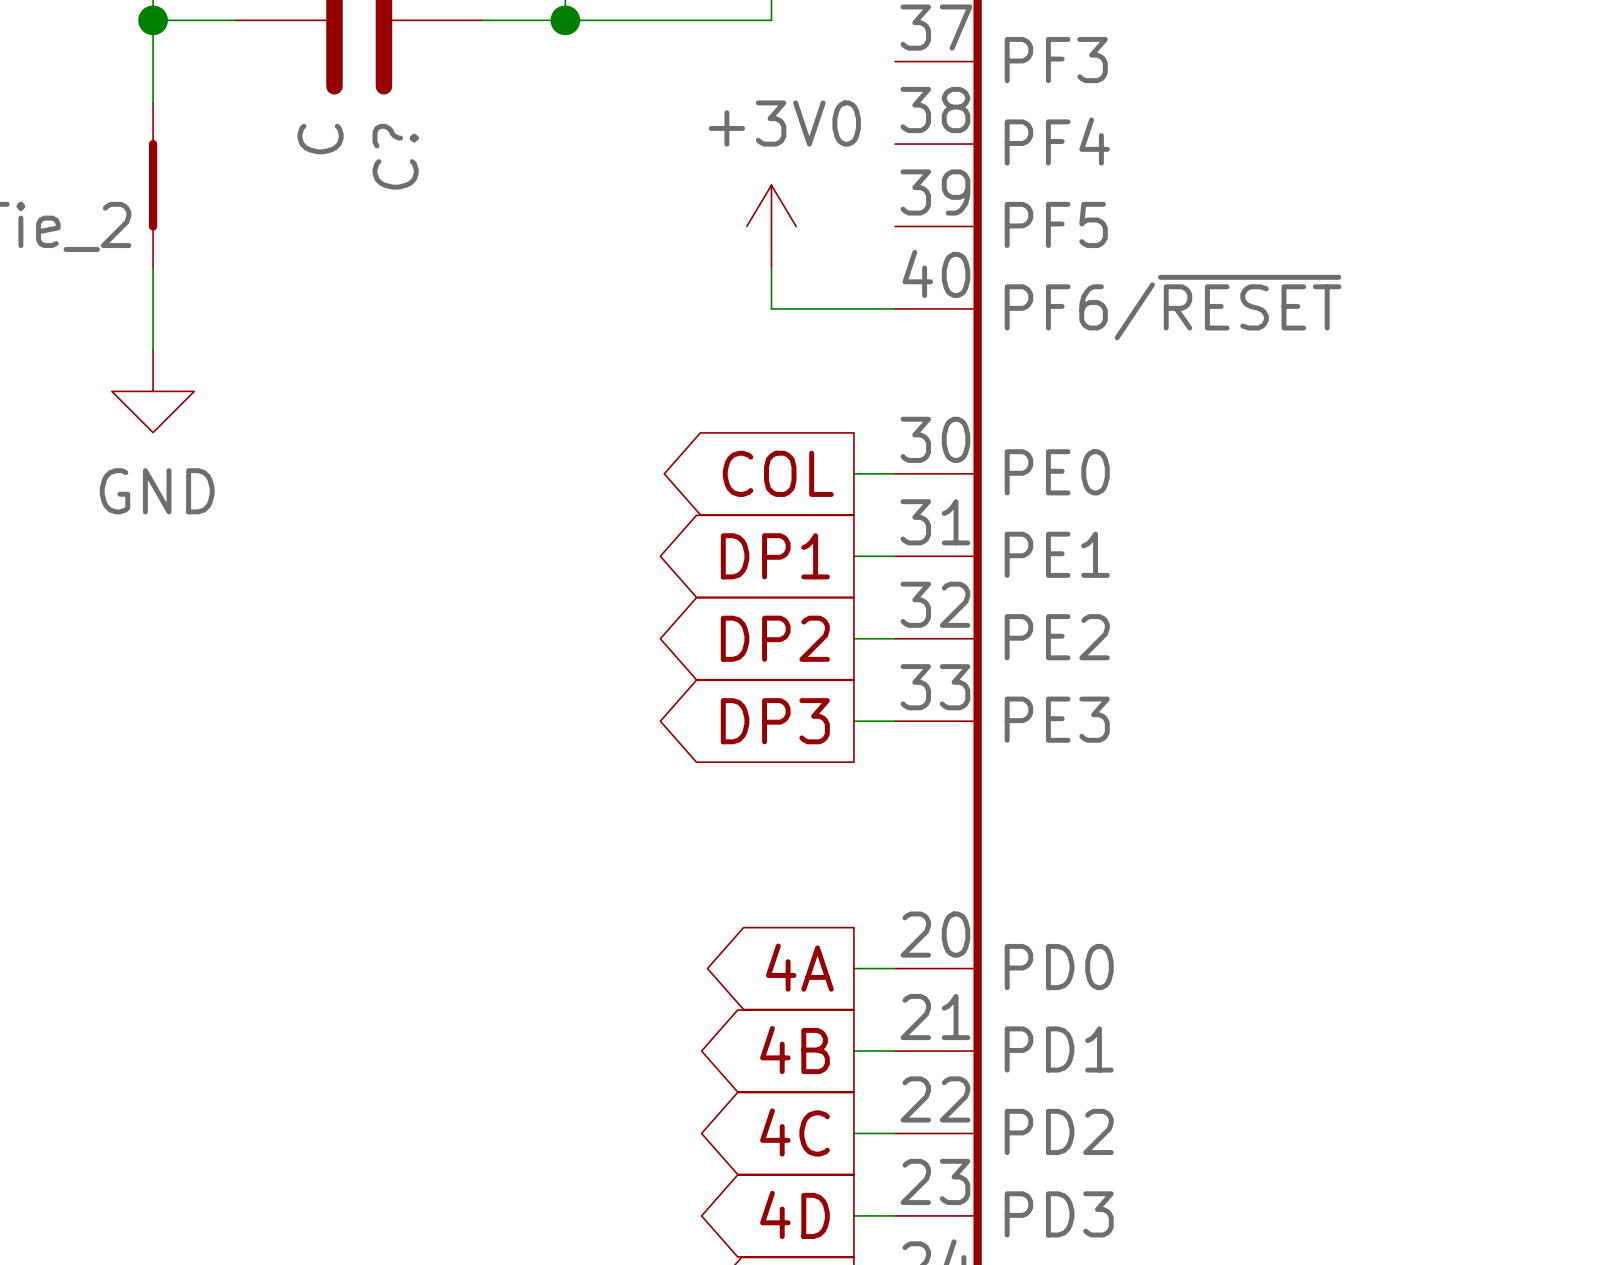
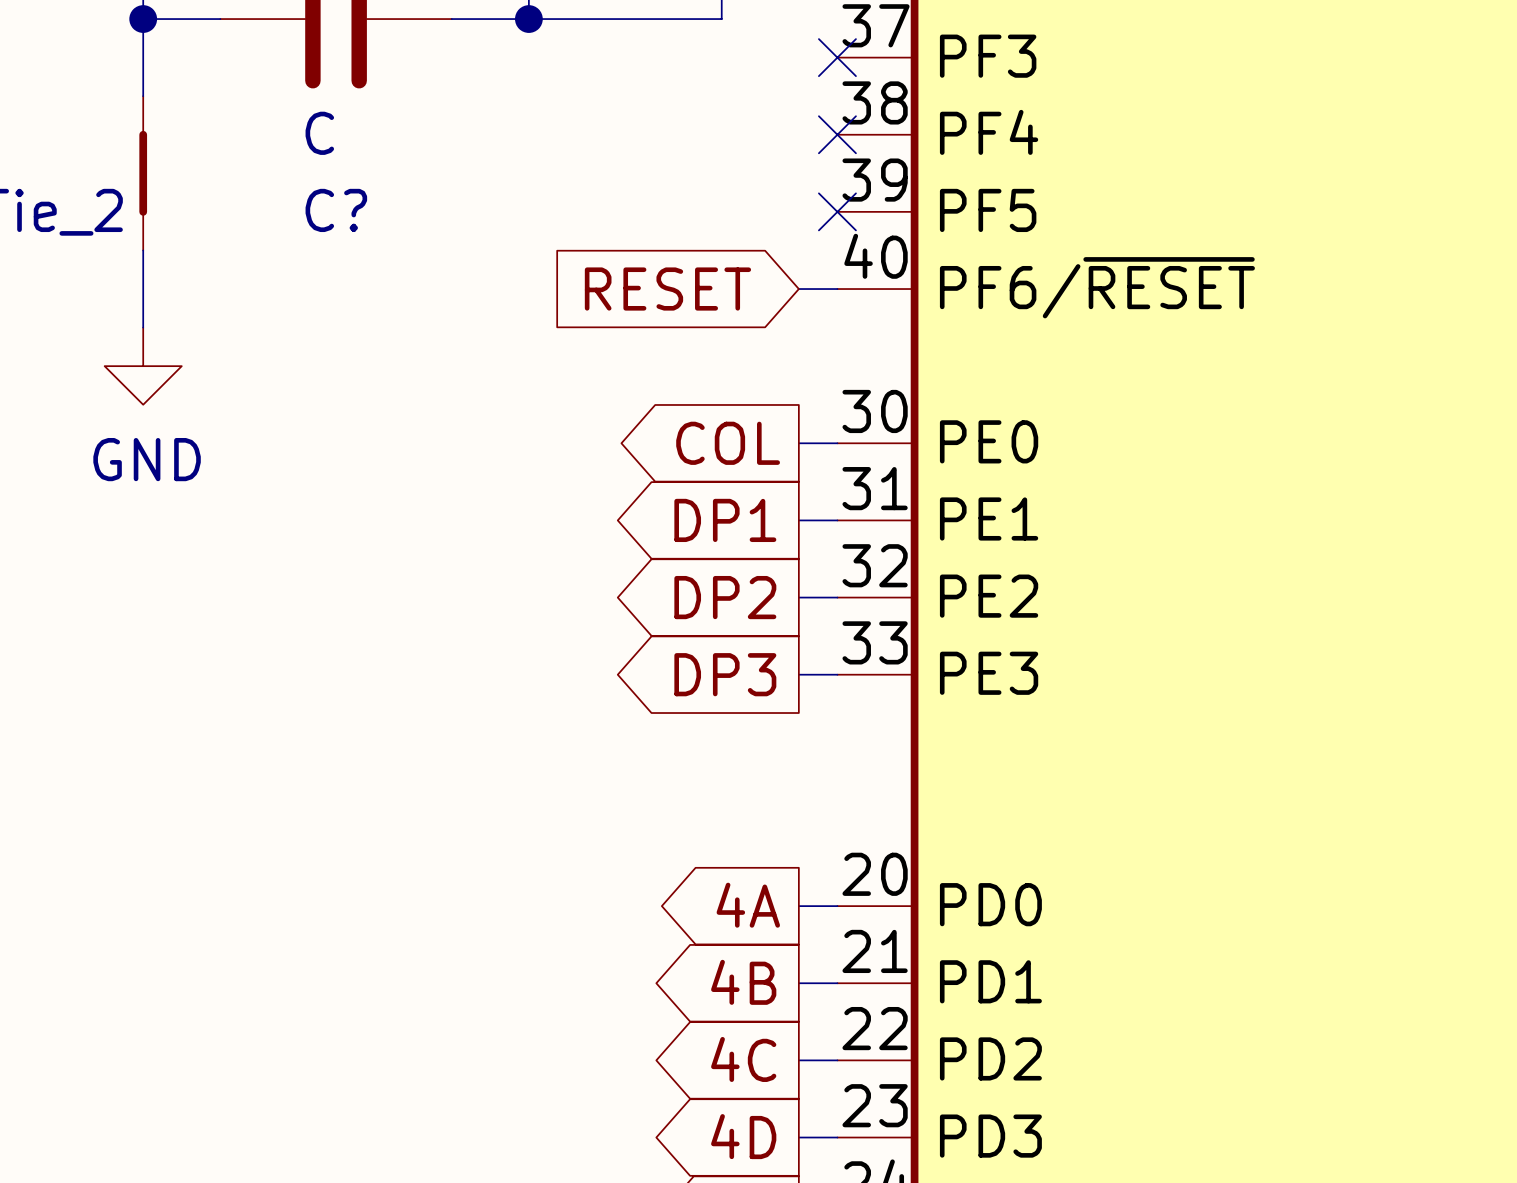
no-connect mark: none -> (837, 57)
C? value rotation: 0° (320, 139) -> 90° clockwise (319, 133)
no-connect mark: none -> (837, 134)
C? name rotation: 0° (395, 156) -> 90° clockwise (336, 210)
power symbol: +3V0 (771, 226) -> none
no-connect mark: none -> (837, 211)
wire: (771, 267) (771, 308) (853, 308) -> none
global label: none -> RESET (667, 289)

